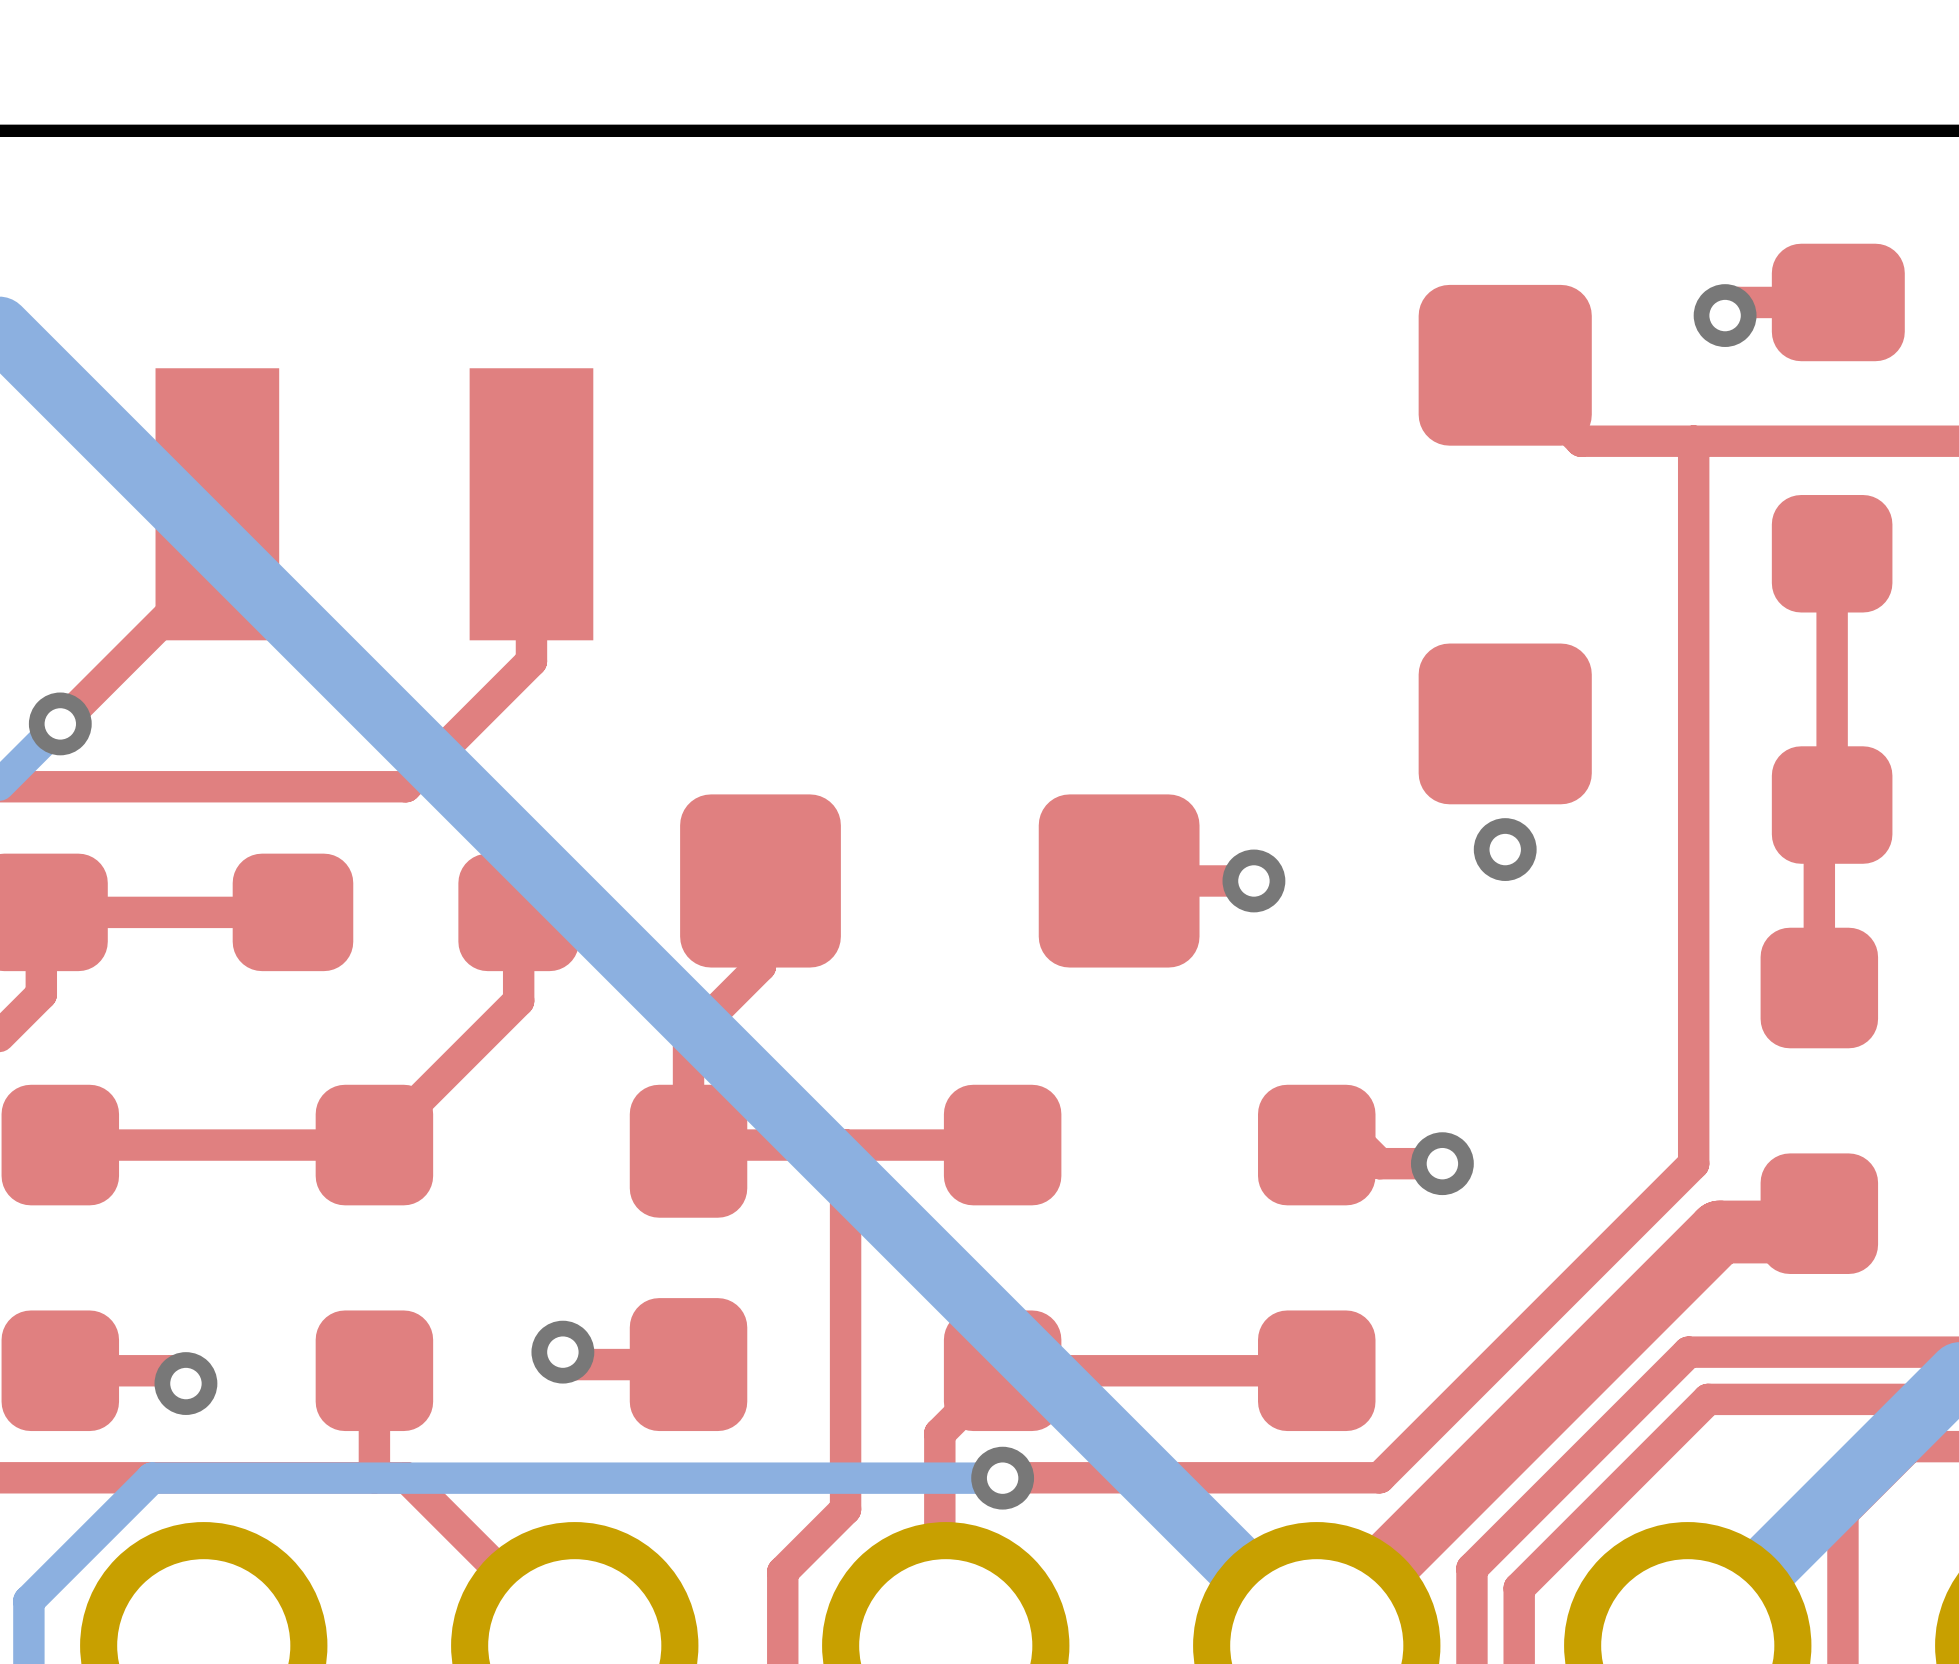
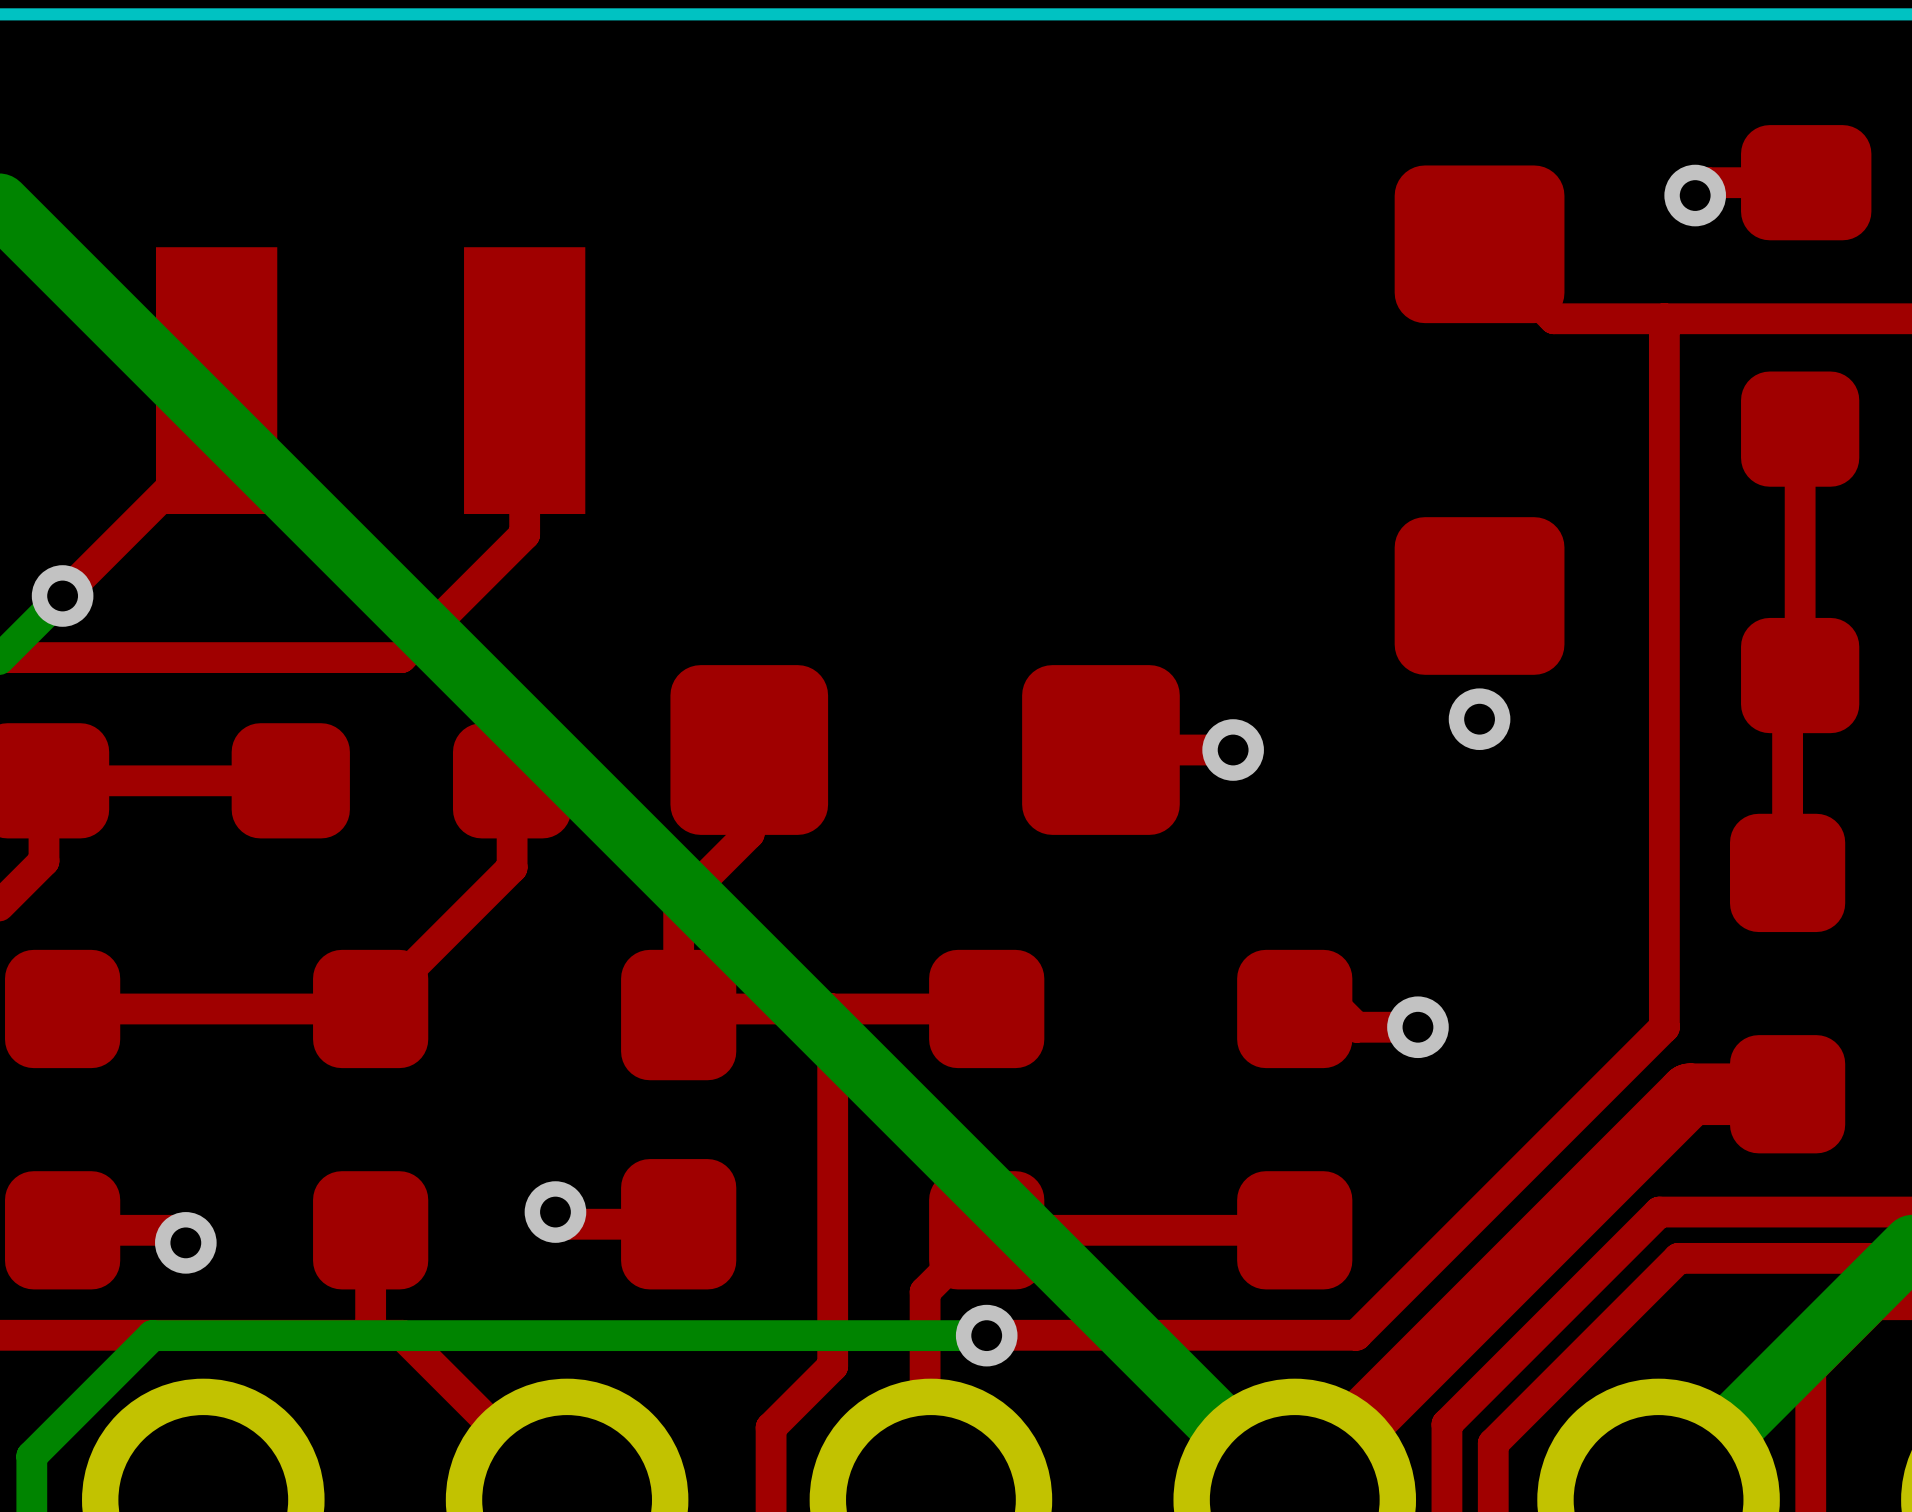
part position: (1819, 1100) -> (1787, 983)

